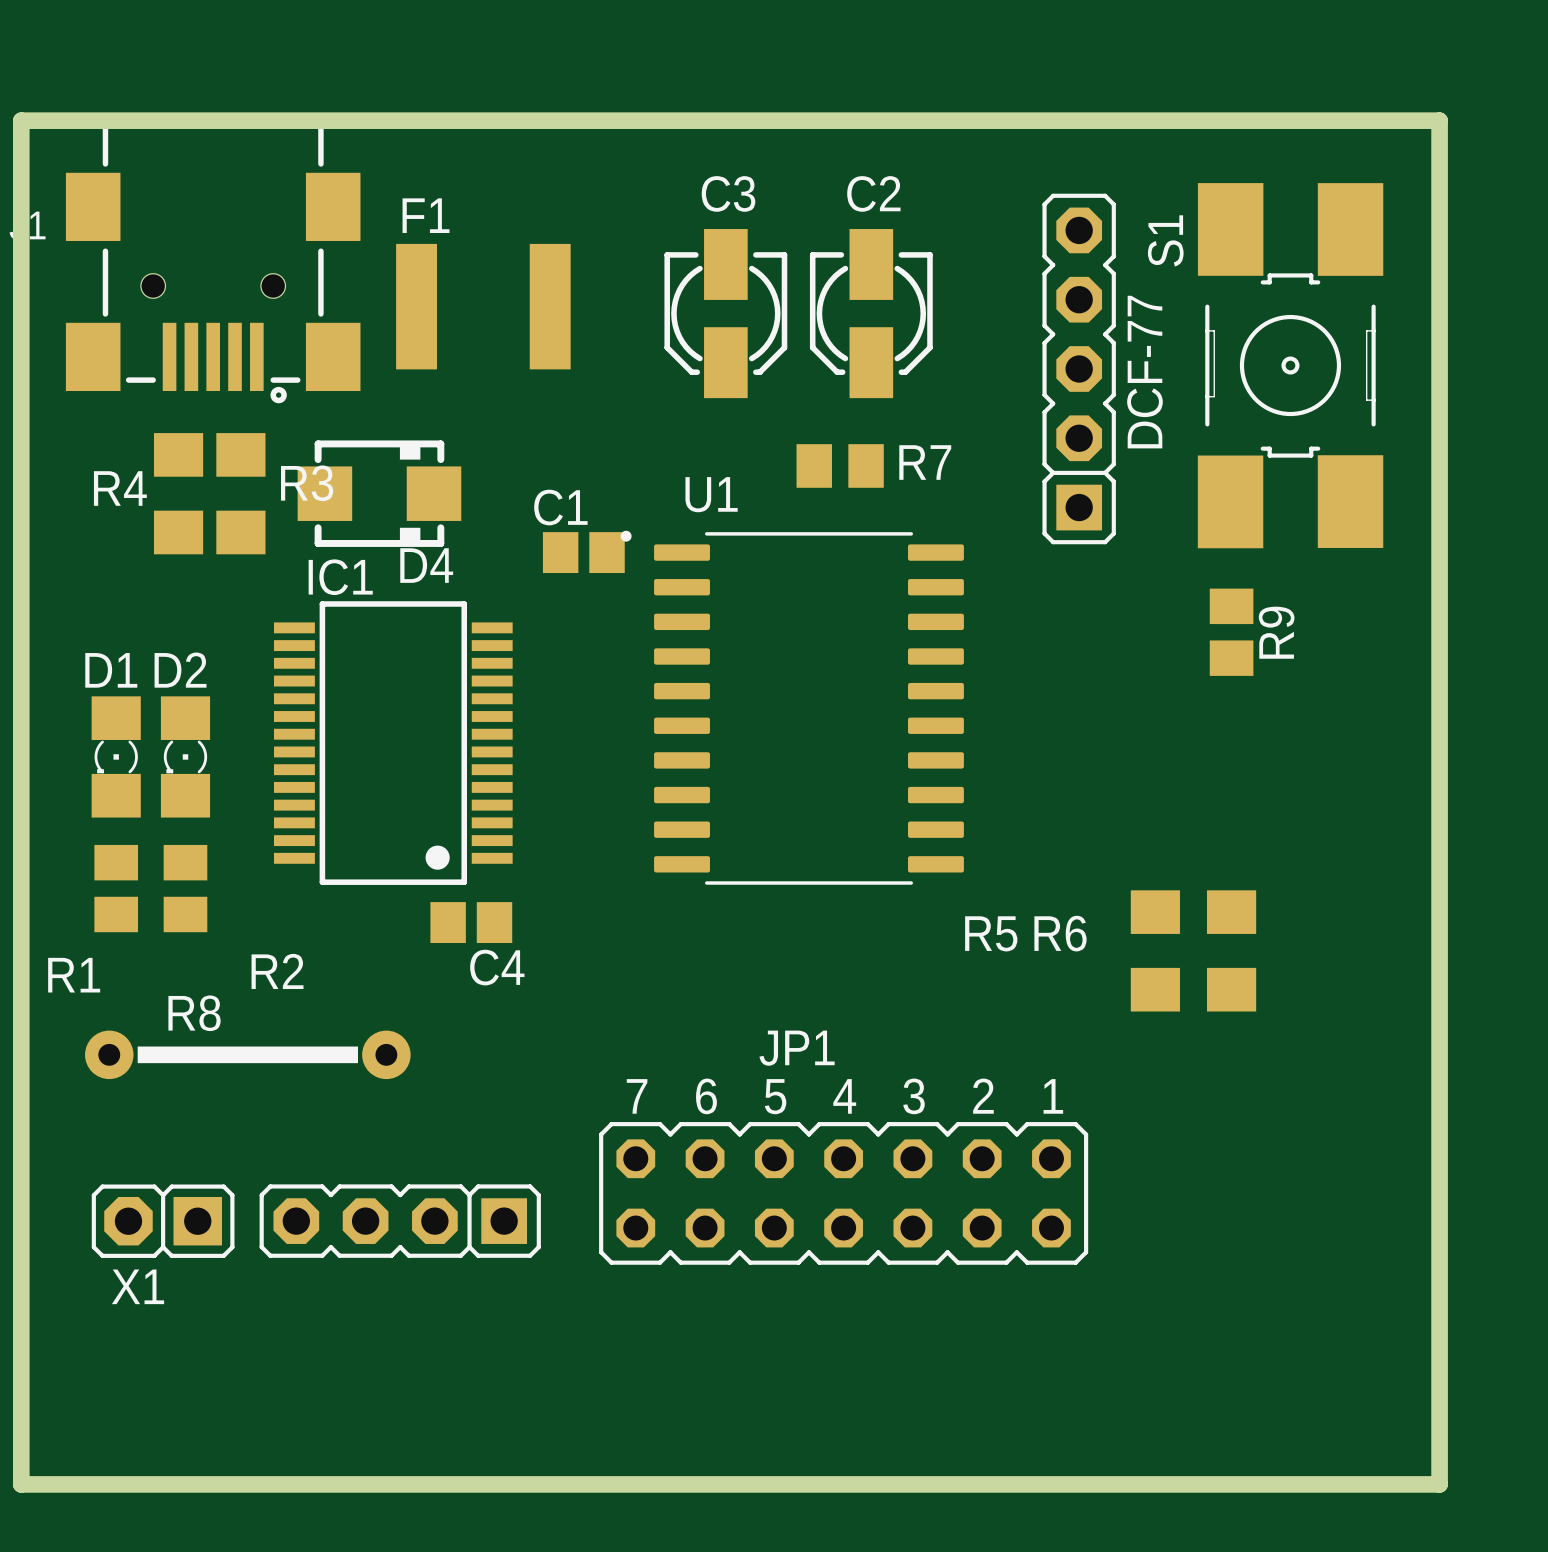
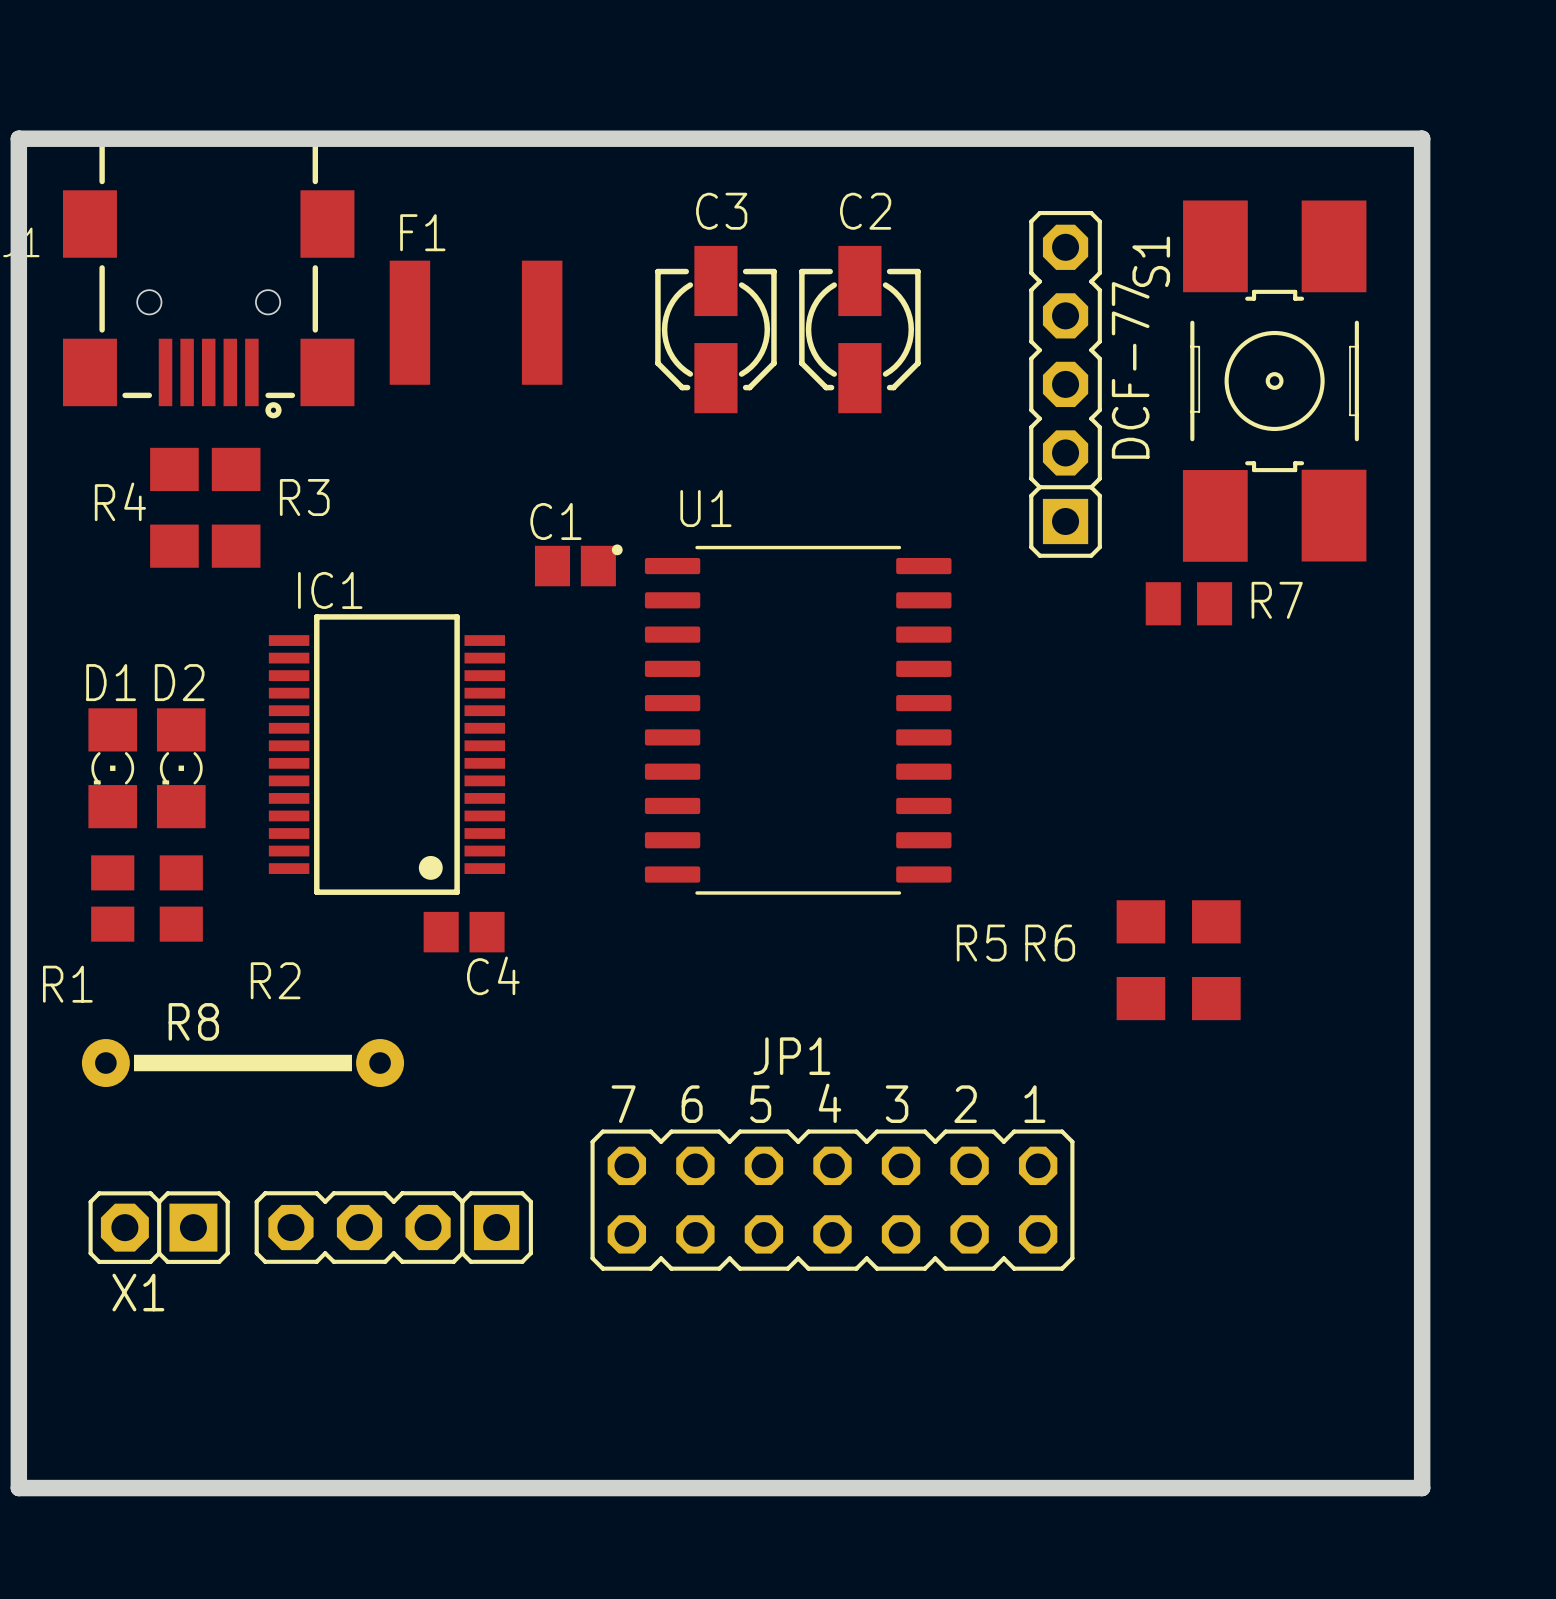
R7 position: (840, 465) -> (1188, 603)
D4: (379, 493) -> none
R9: (1231, 632) -> none

